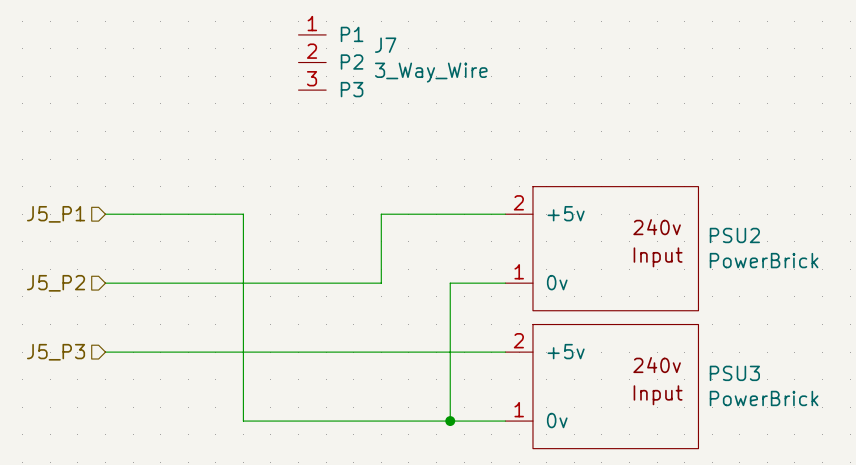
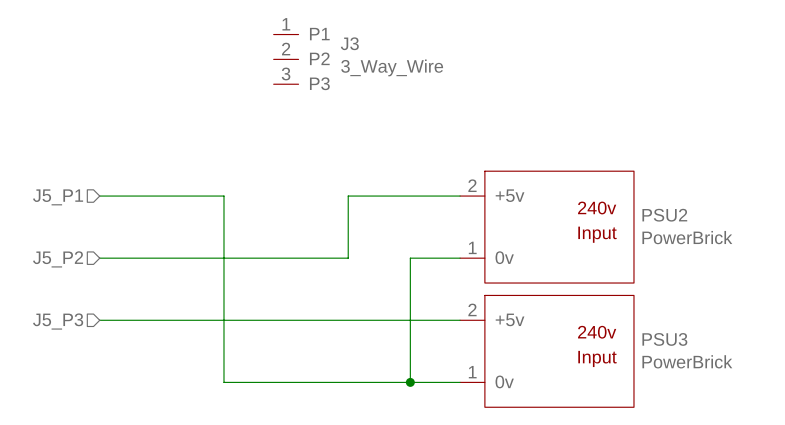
J7 name: J7 (385, 45) -> J3 (349, 43)

